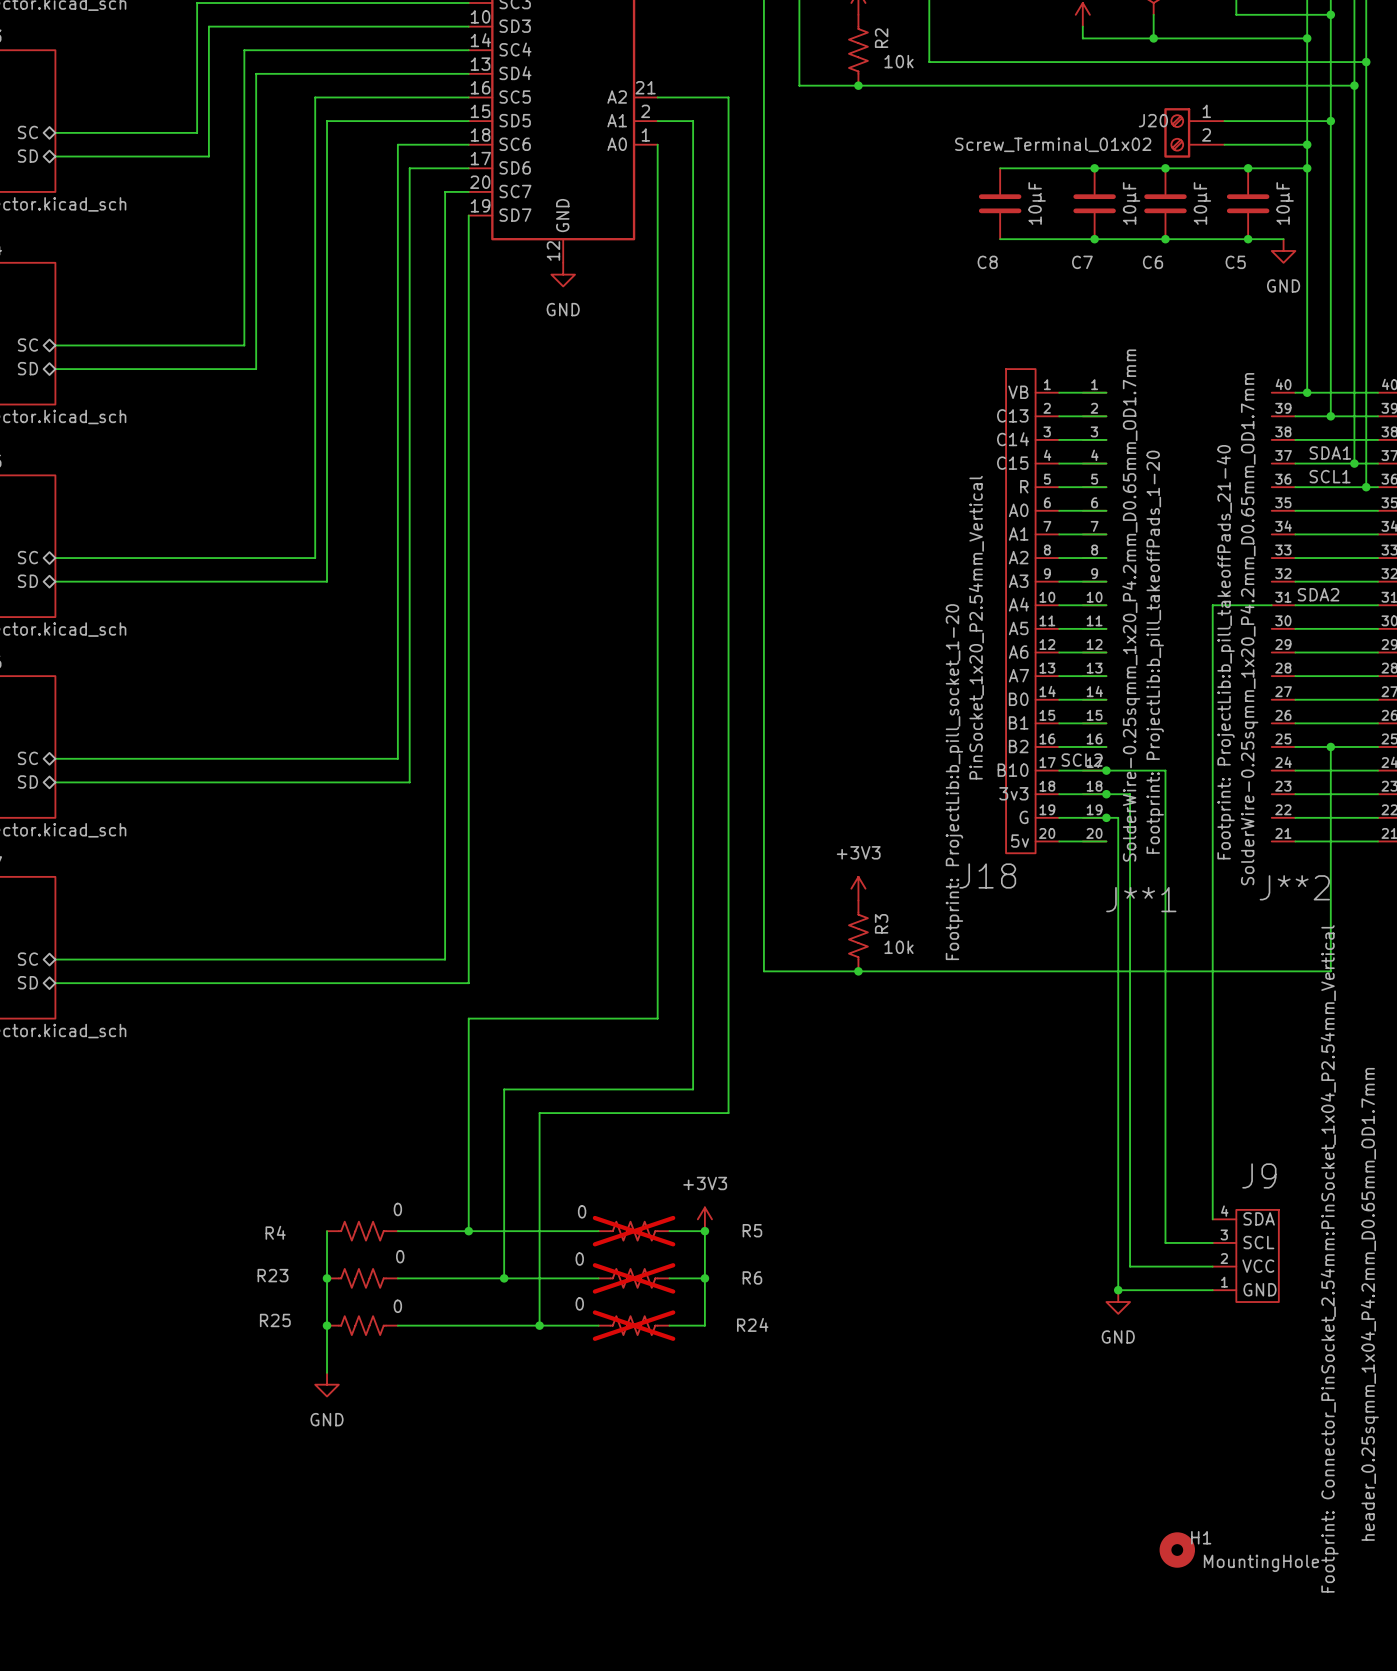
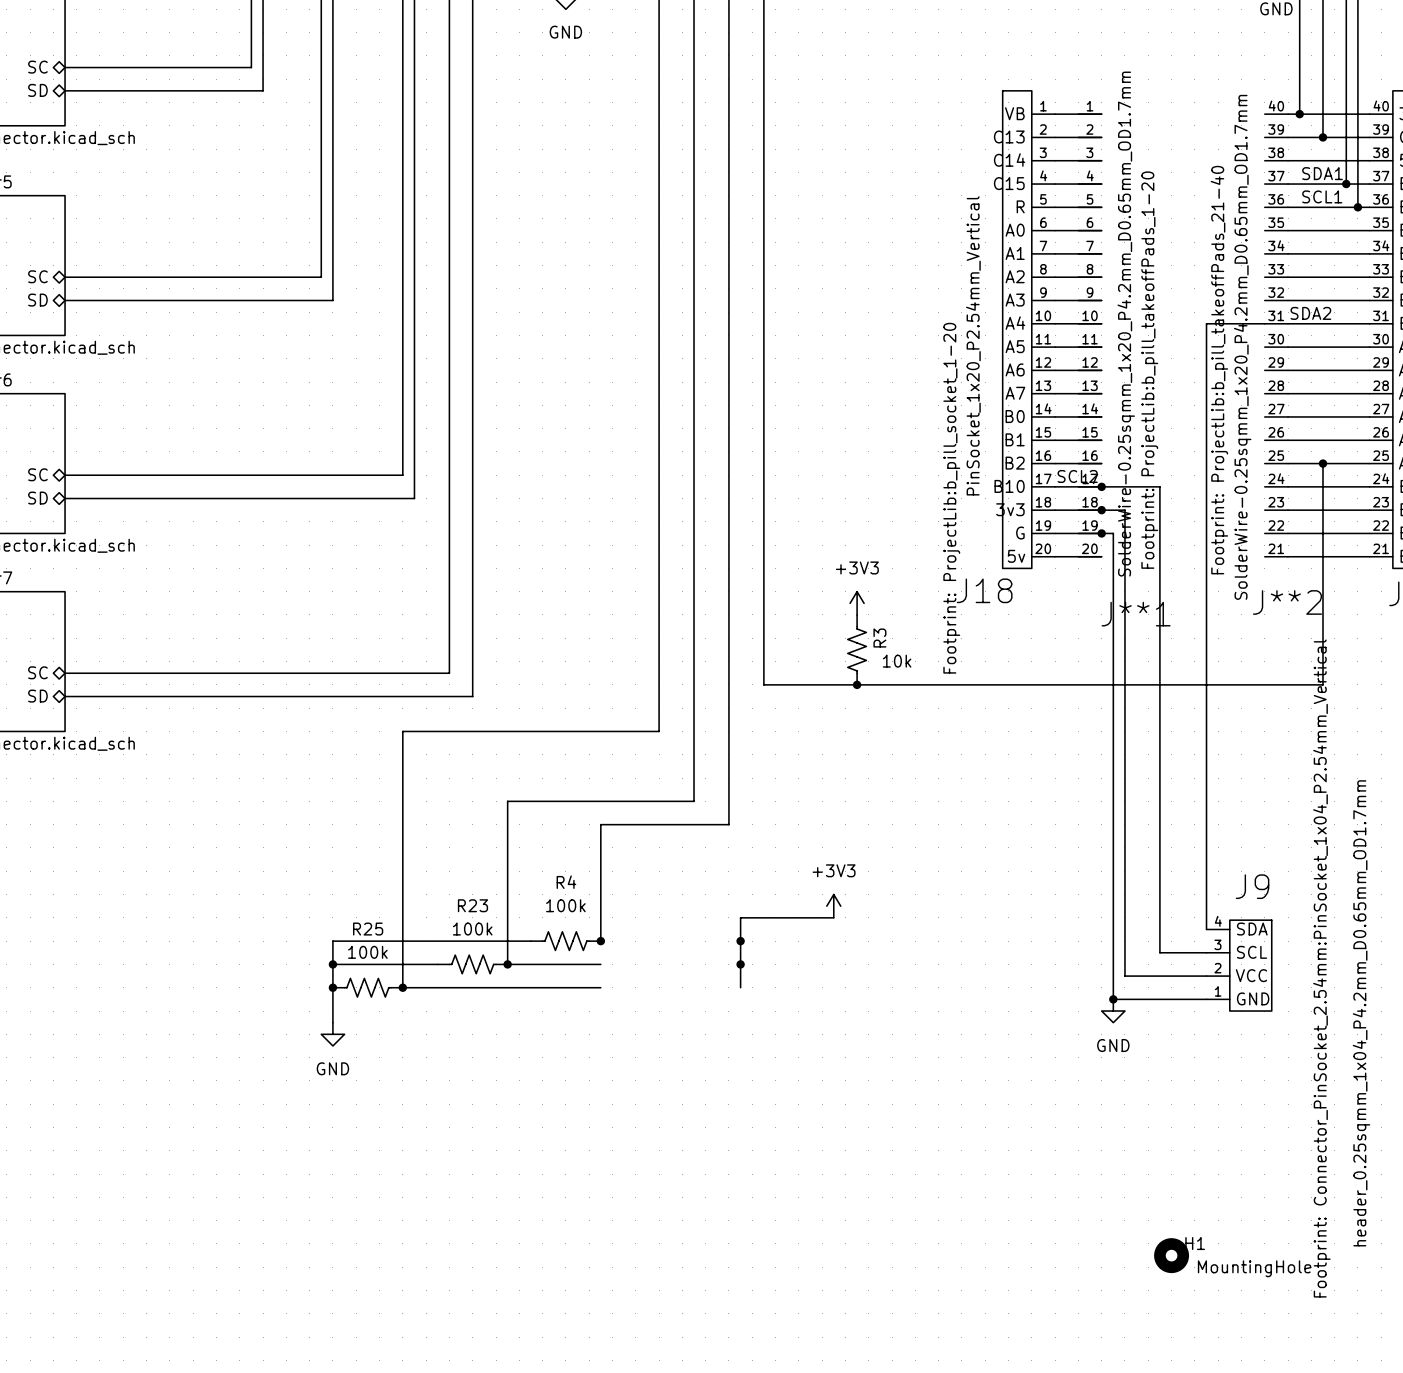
wire: (468, 1018) (468, 1231) -> (472, 731) (402, 731) (402, 987)
wire: (598, 1113) (539, 1113) (539, 1325) -> (600, 824) (600, 941)
wire: none -> (833, 917) (740, 917) (740, 987)
R4 value: 0 (397, 1209) -> 100k (565, 905)
power symbol position: +3V3 (704, 1219) -> +3V3 (833, 906)
R4 position: (362, 1231) -> (565, 941)
junction: (468, 1231) -> none
junction: none -> (600, 941)
R5: 0 (634, 1231) -> none
wire: (669, 1231) (704, 1231) (704, 1325) (669, 1325) -> none
junction: (704, 1231) -> none
junction: none -> (740, 941)
R4 name position: R4 (275, 1232) -> R4 (566, 882)
wire: none -> (332, 964) (437, 964)
junction: none -> (332, 964)
R23: none -> 100k (472, 964)
wire: (504, 1254) (504, 1278) -> (507, 964) (600, 964)
junction: none -> (507, 964)
junction: none -> (740, 964)
R23 value: 0 (400, 1256) -> 100k (367, 952)
R23 name: R23 (272, 1275) -> R25 (368, 929)
junction: none -> (402, 987)
junction: (504, 1278) -> none
R6: 0 (634, 1278) -> none
wire: (669, 1278) (704, 1278) -> none
junction: (704, 1278) -> none
wire: (327, 1313) (327, 1372) -> none
junction: (327, 1325) -> none
R25: 0 (362, 1325) -> none
wire: (397, 1325) (598, 1325) -> none
junction: (539, 1325) -> none
R24: 0 (634, 1325) -> none
power symbol position: GND (327, 1384) -> GND (332, 1034)

